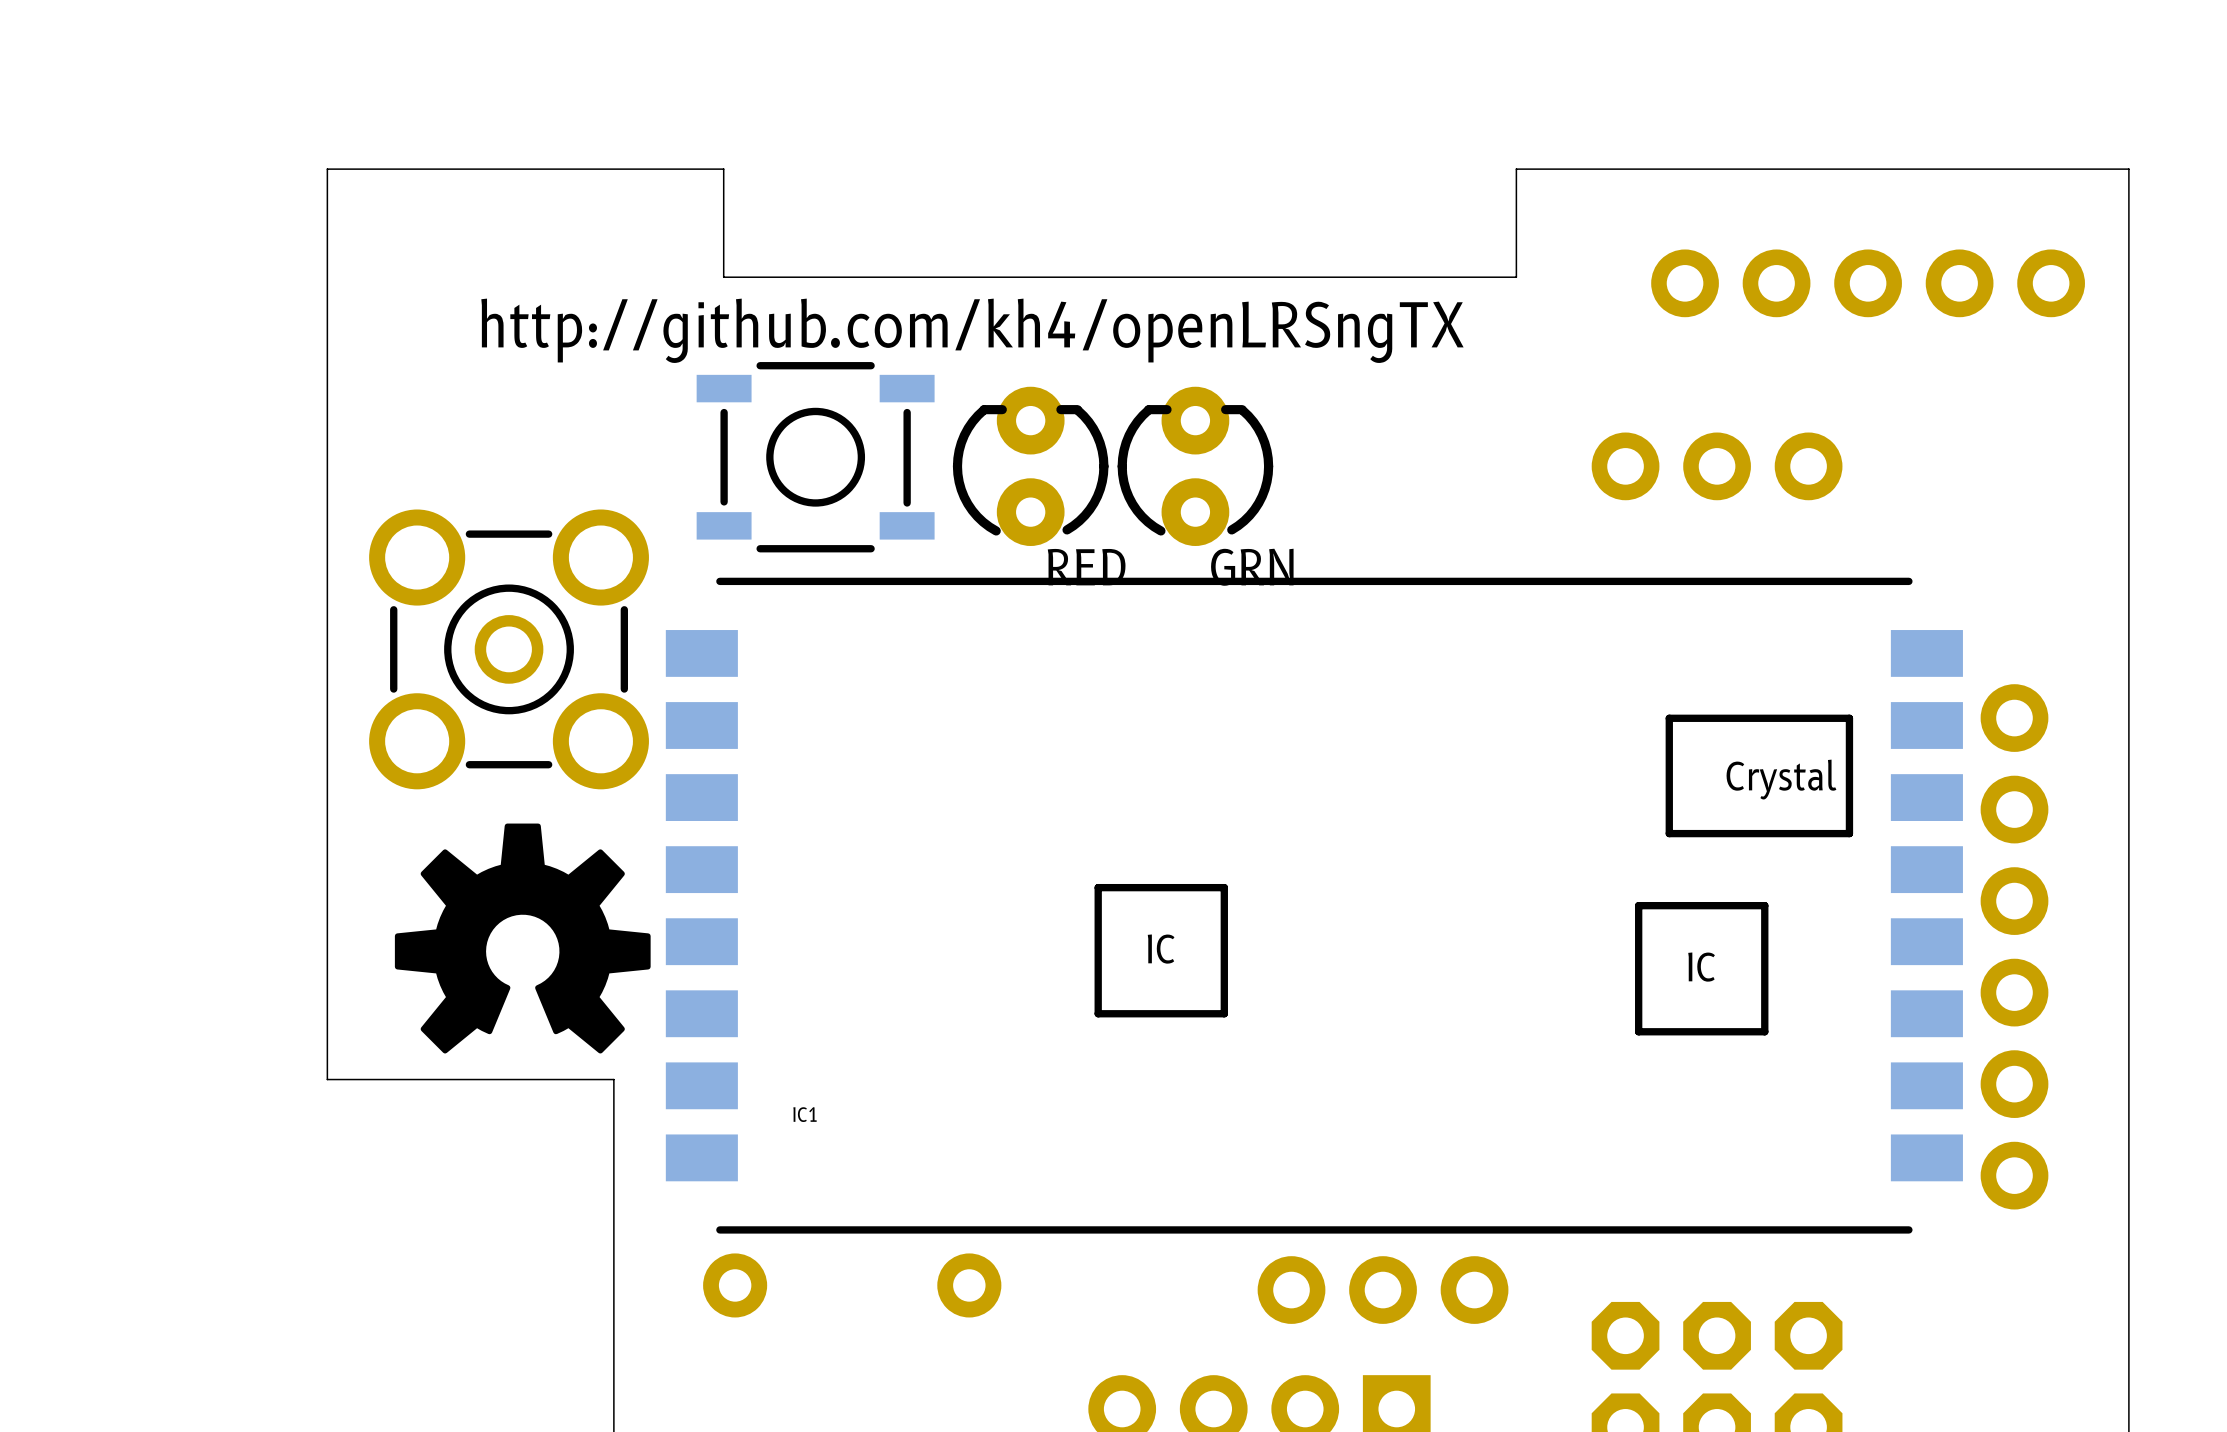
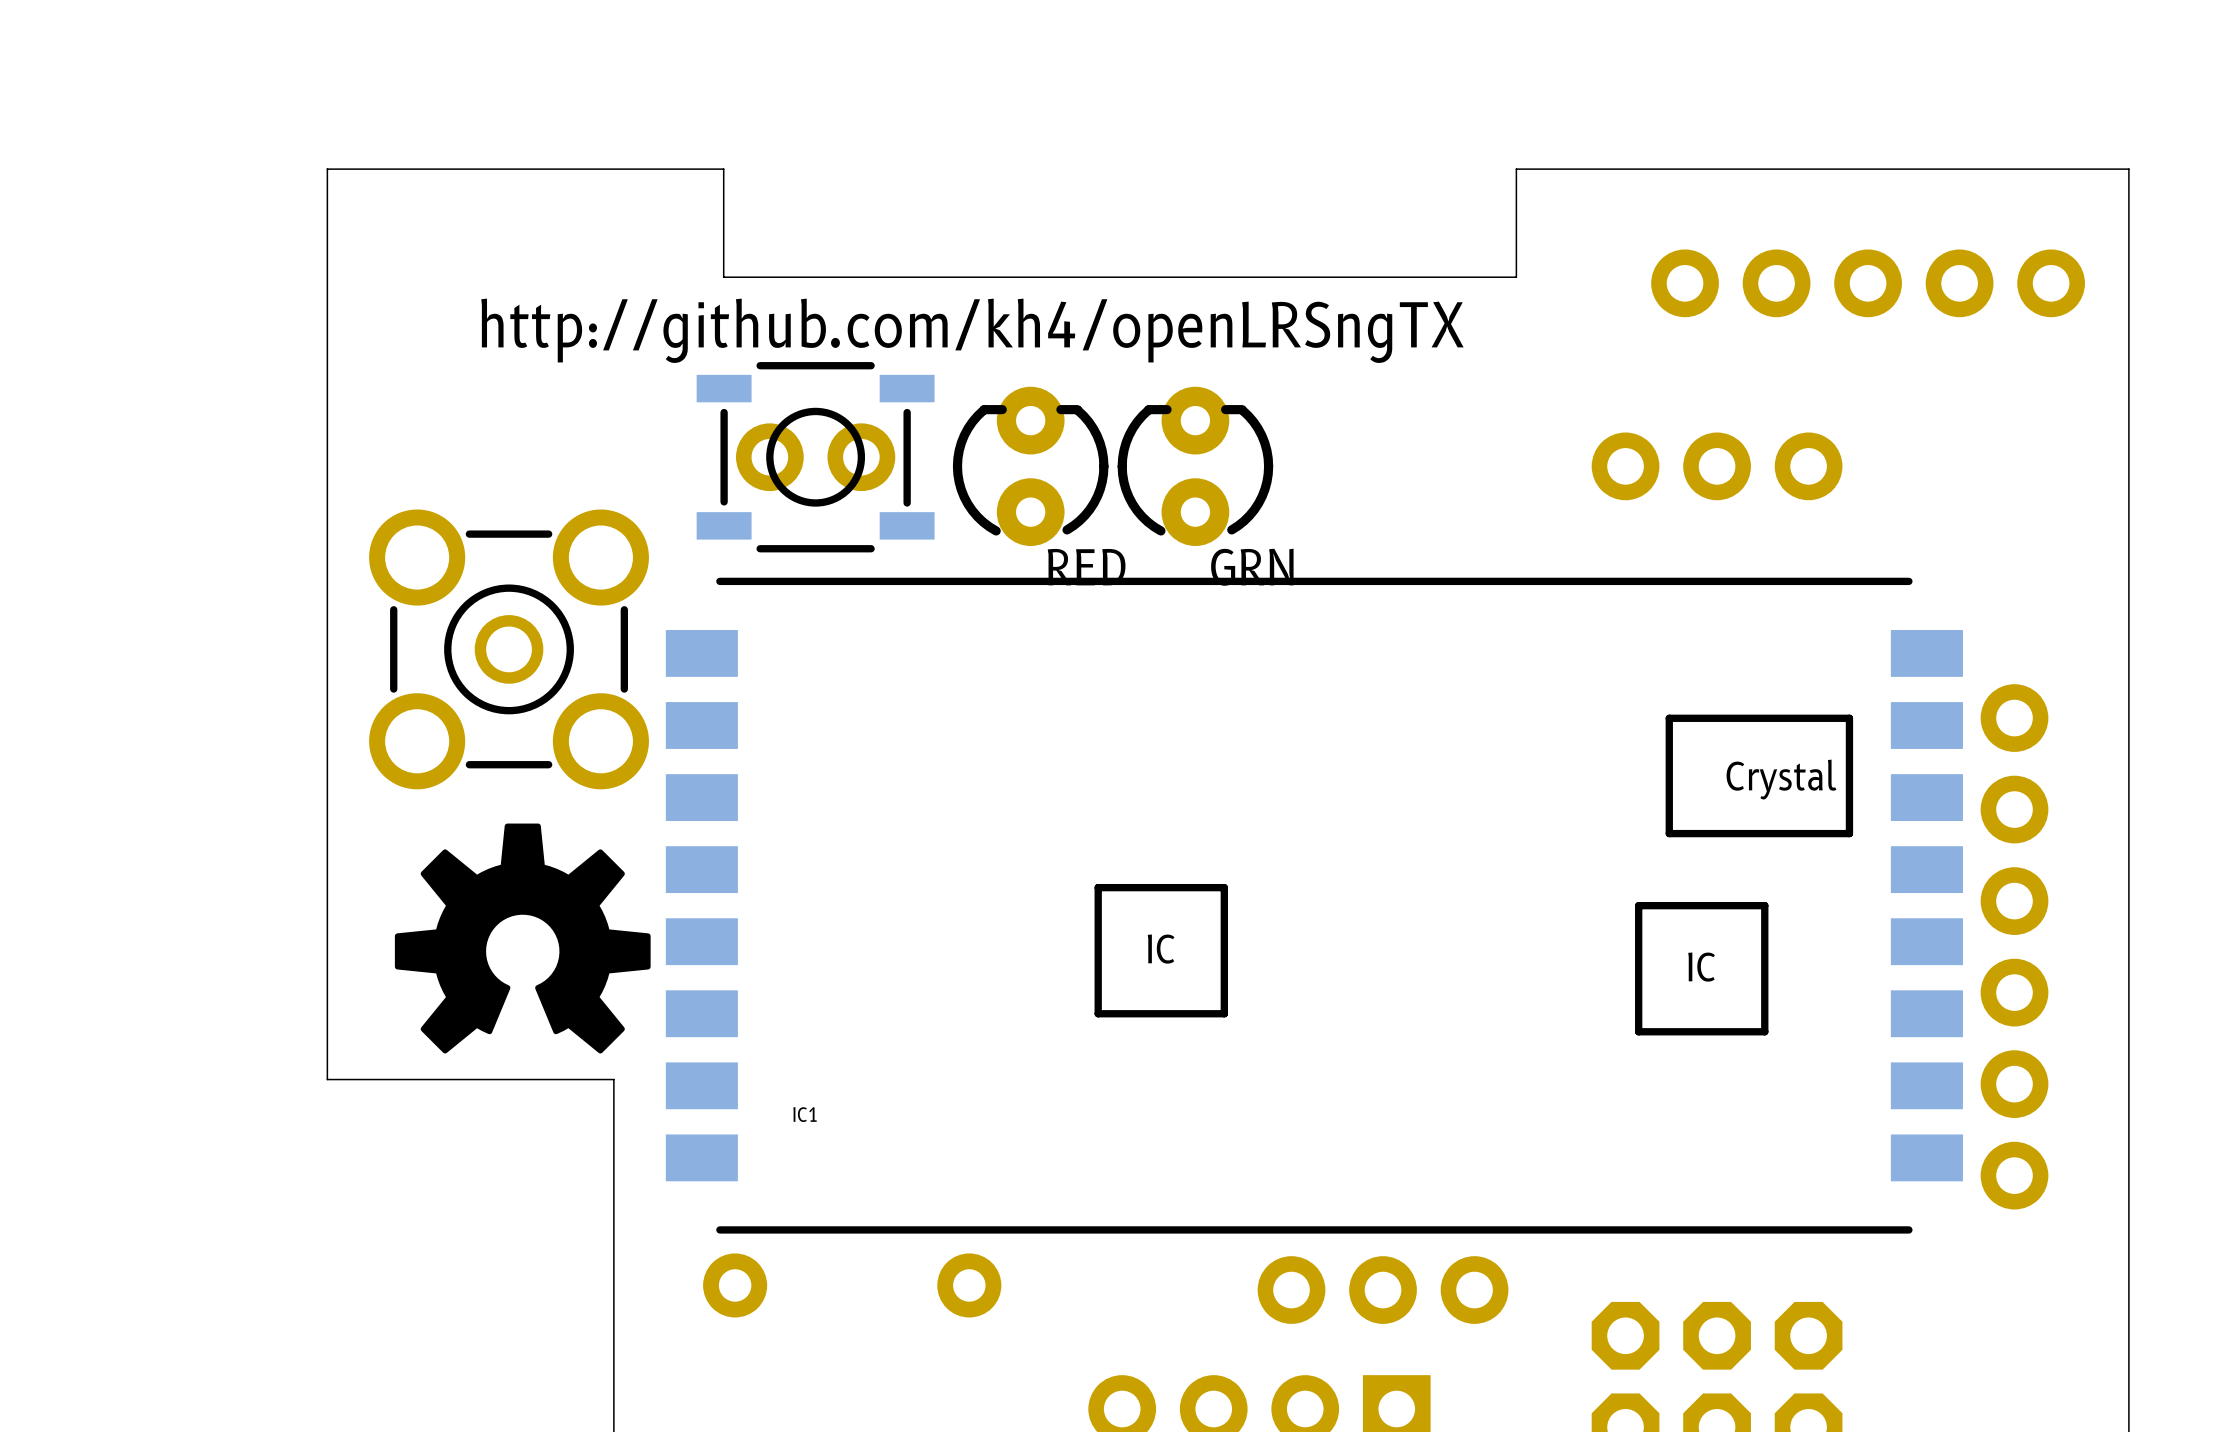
part: none -> (815, 457)

